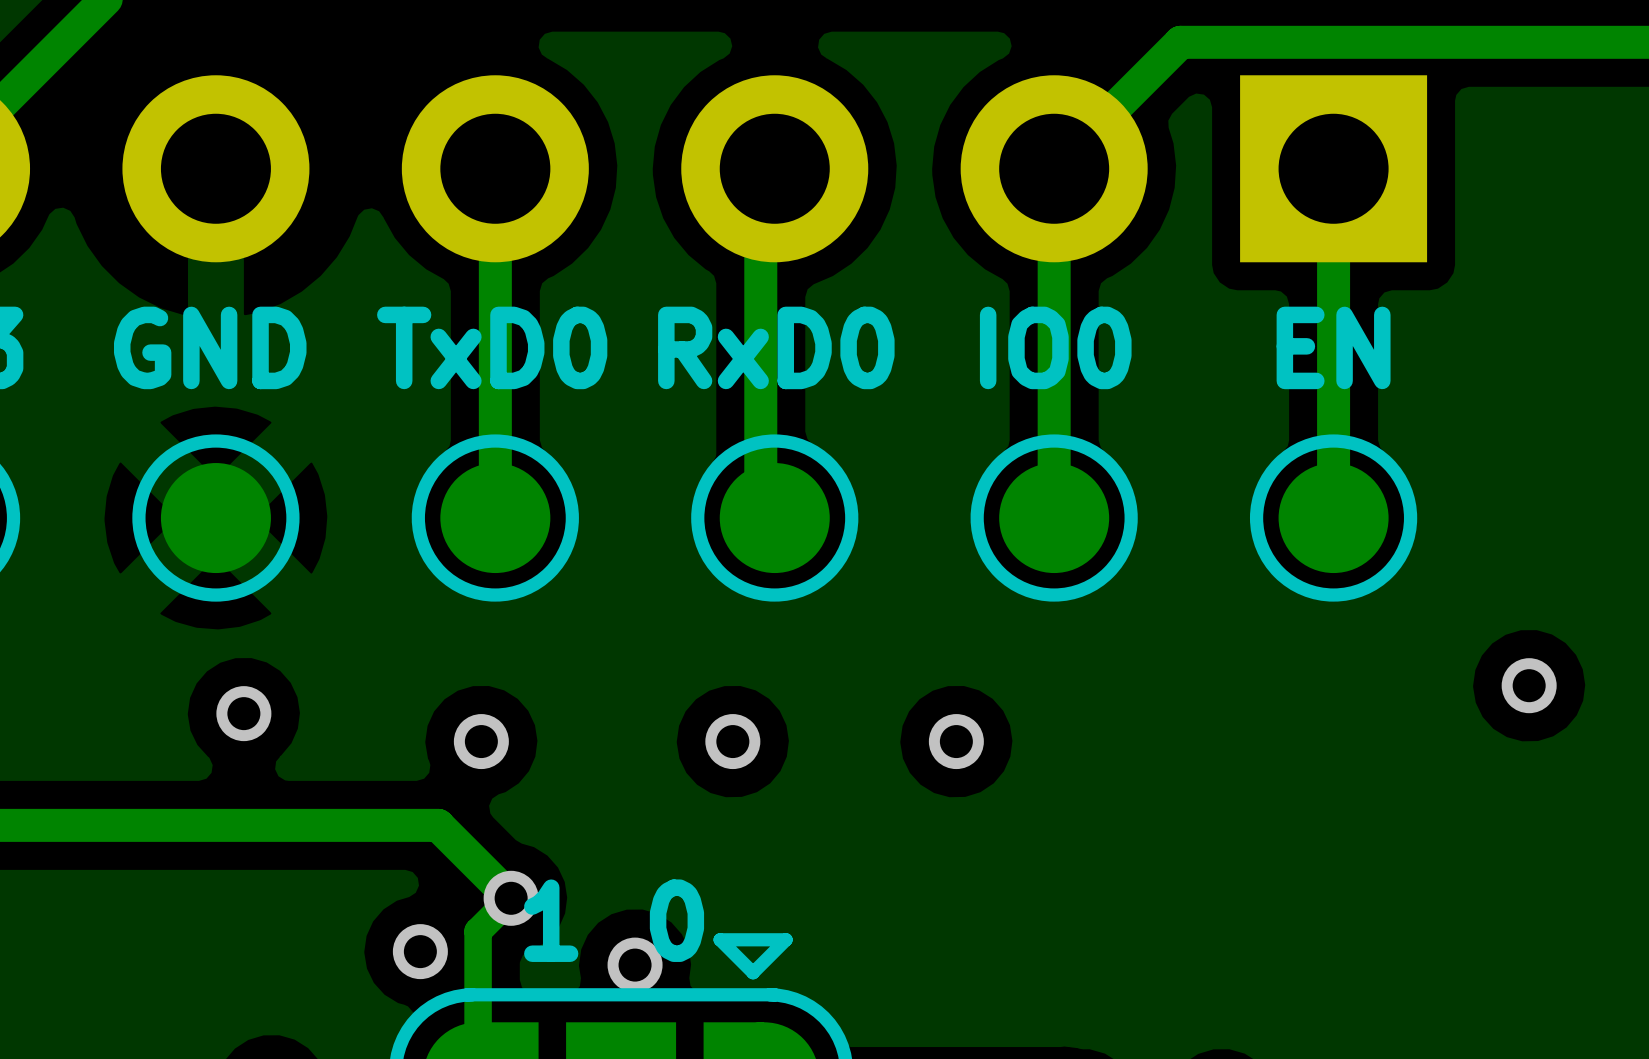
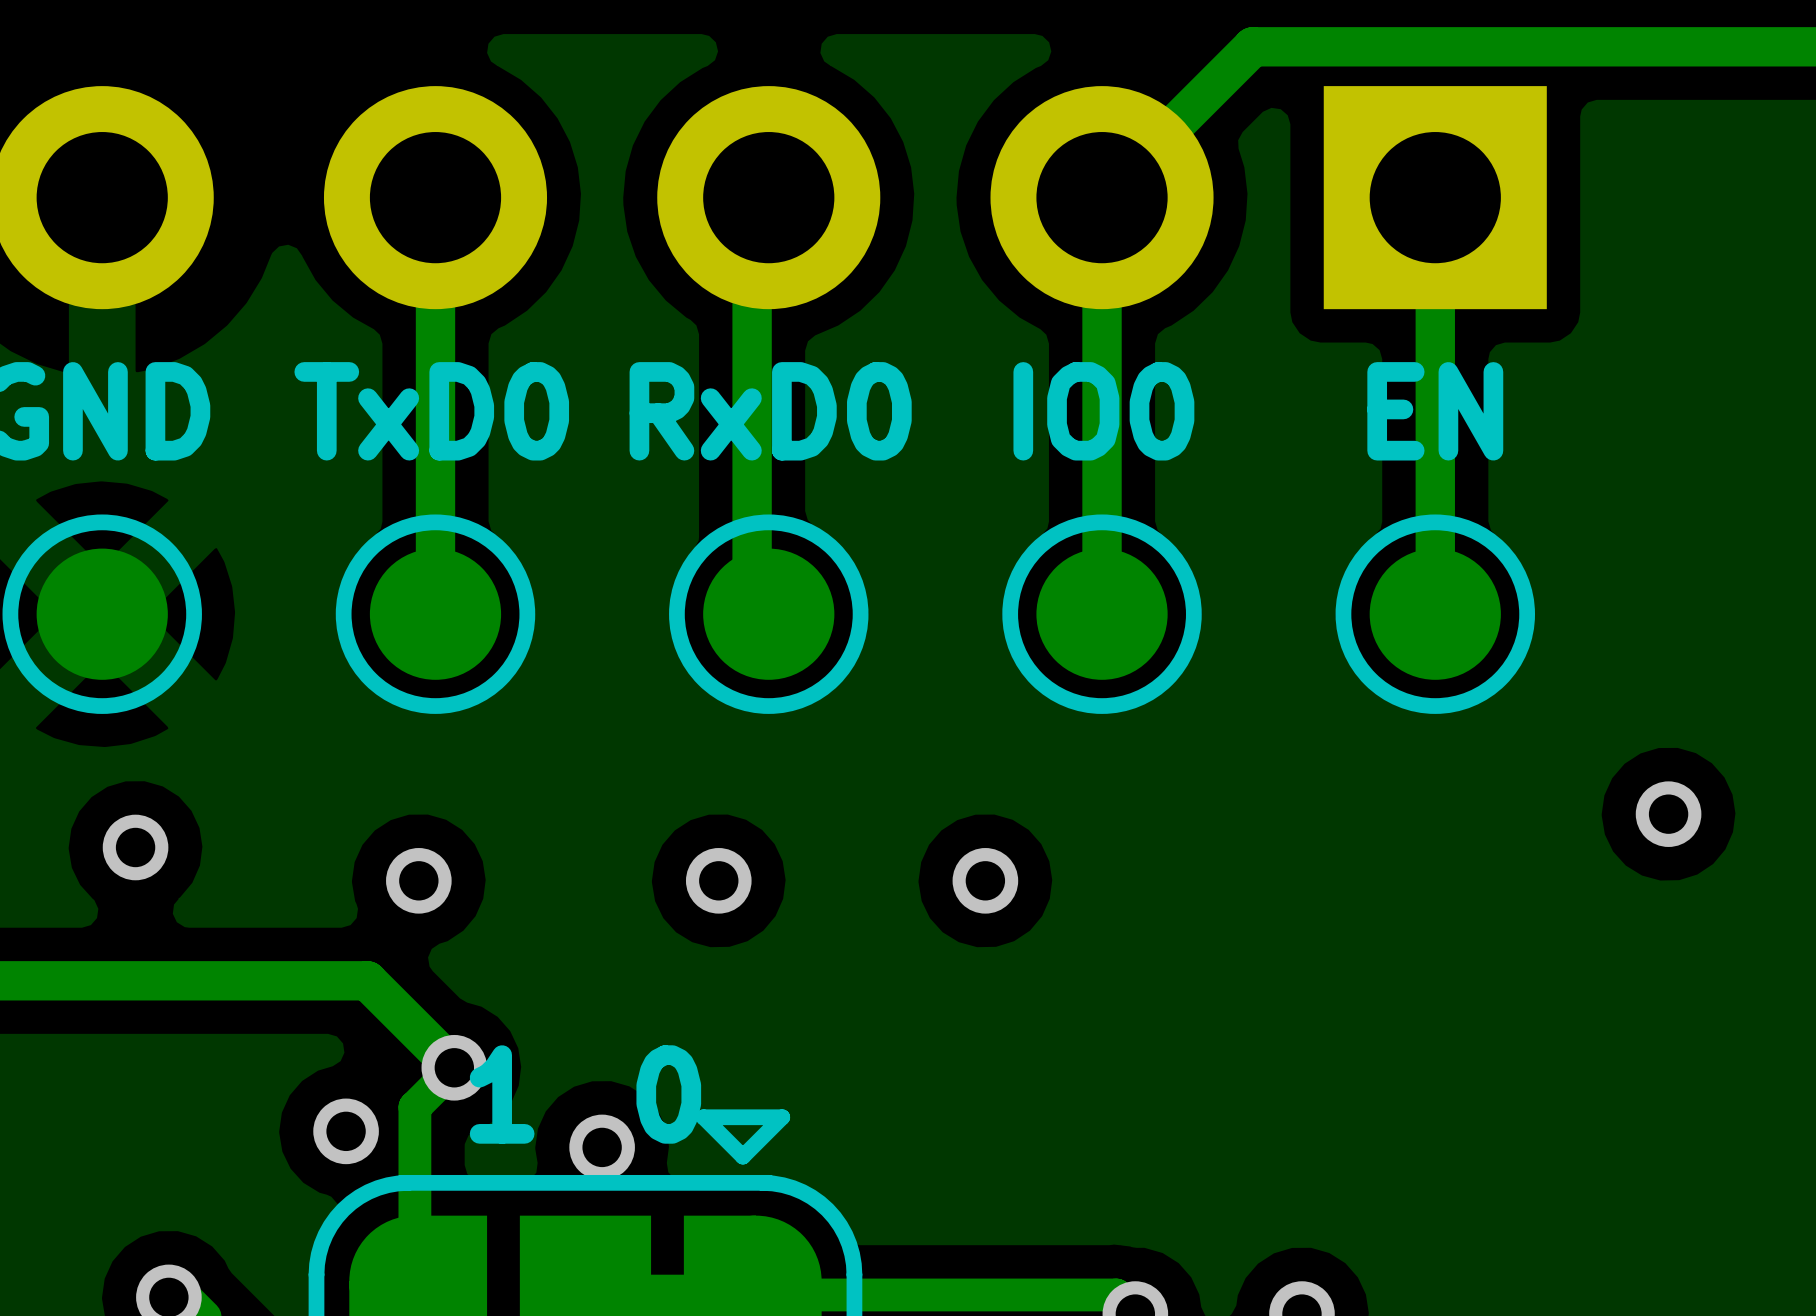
text position: 0 (676, 920) -> 0 (668, 1094)

